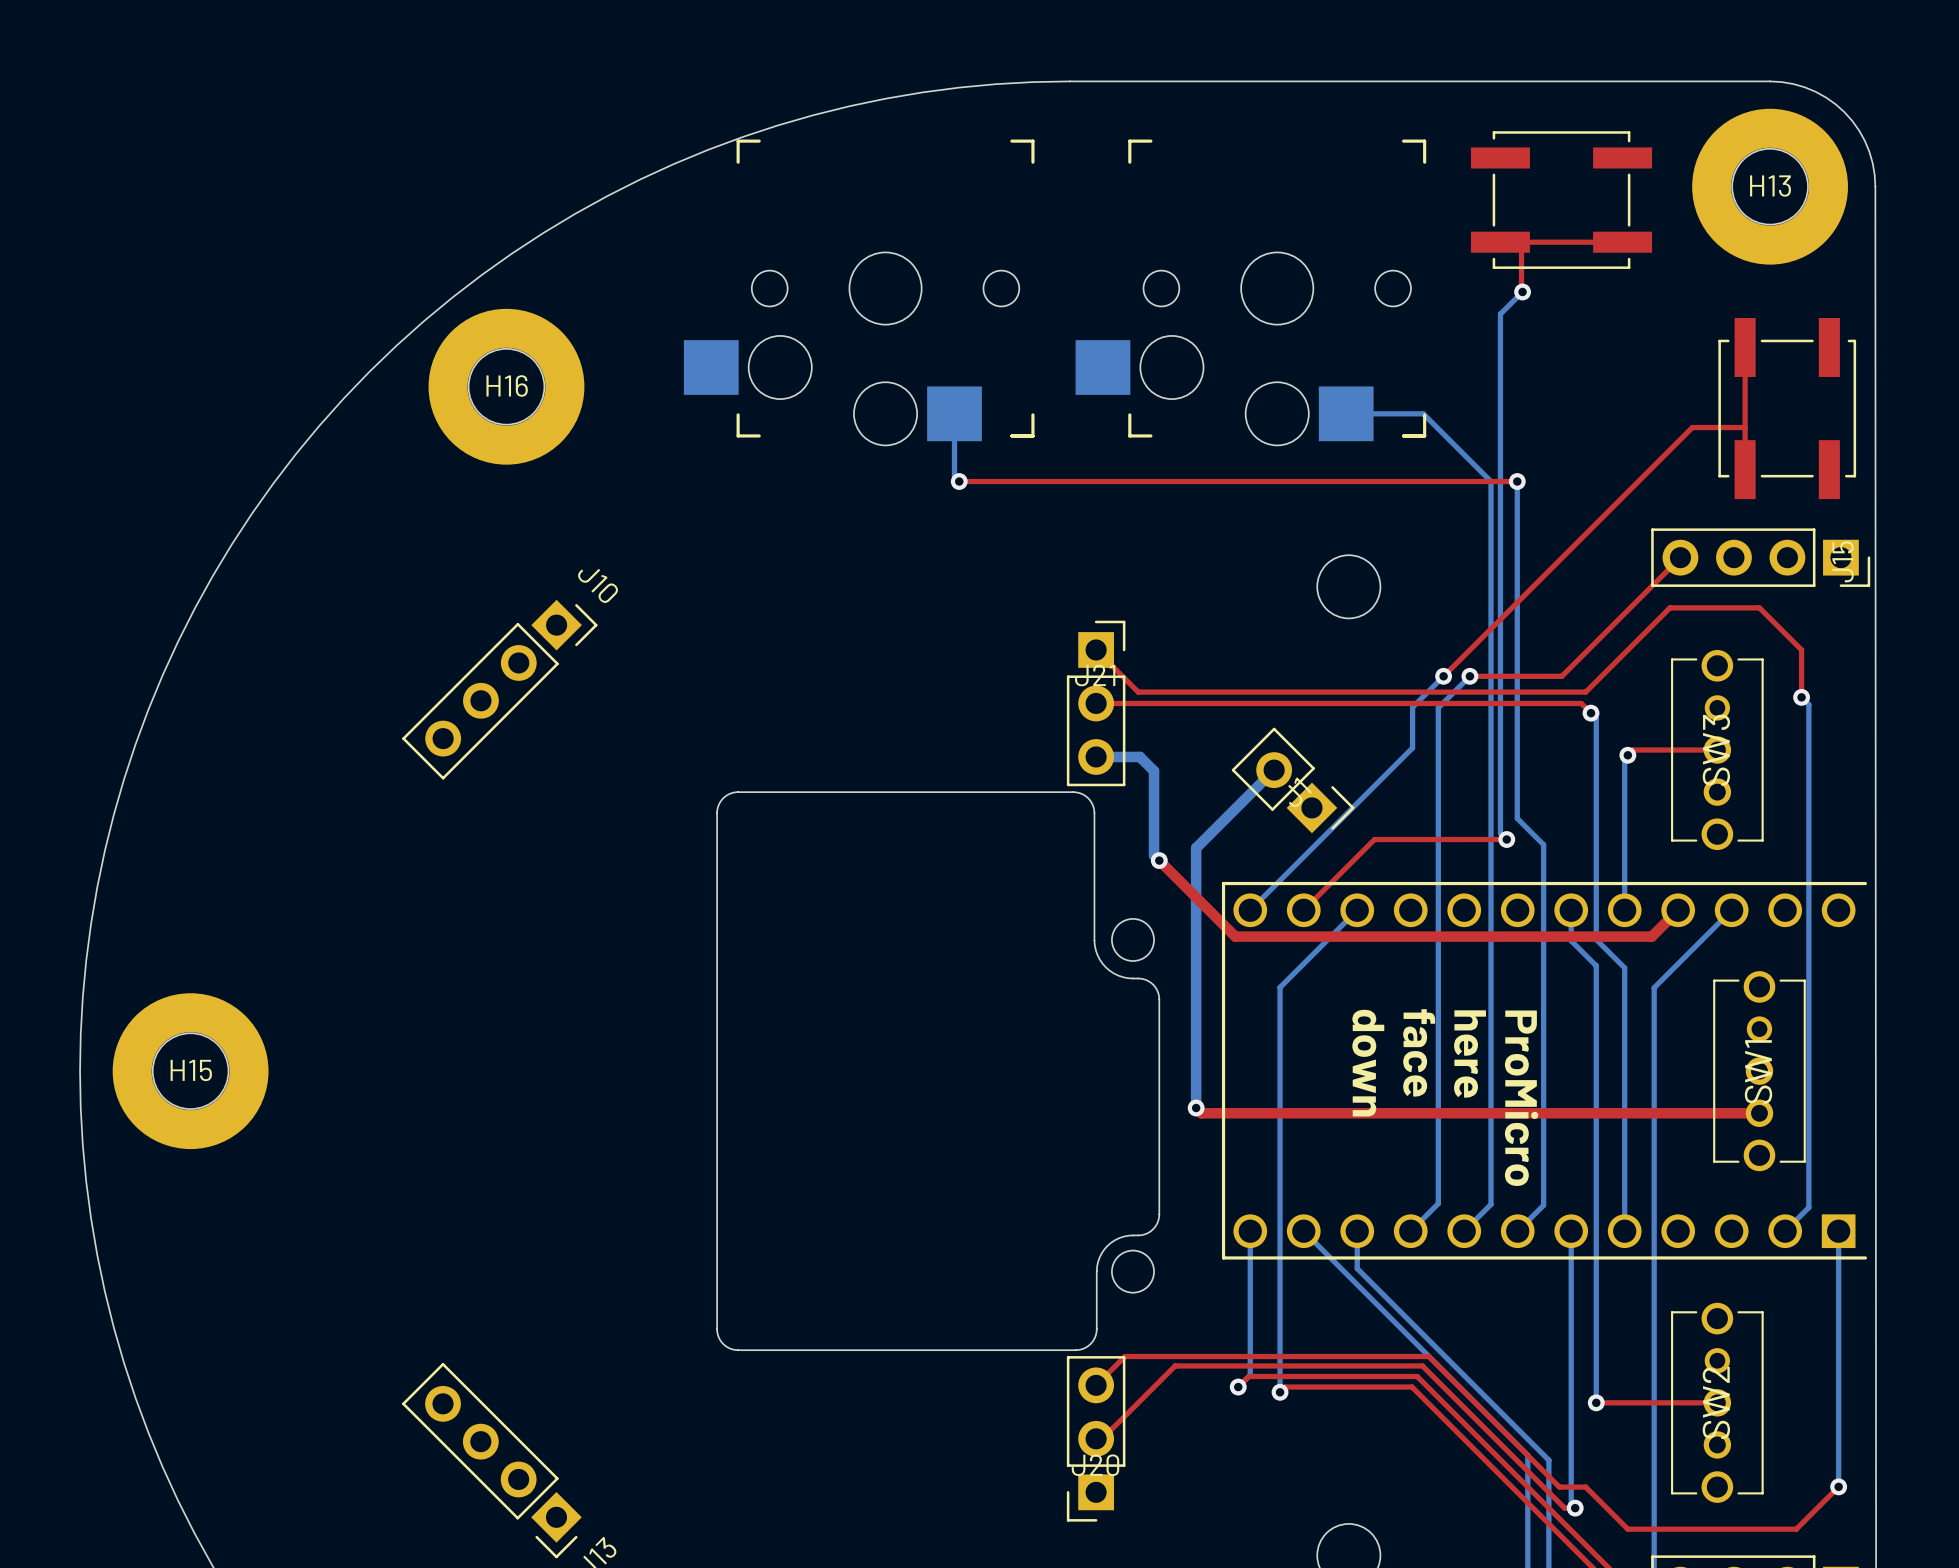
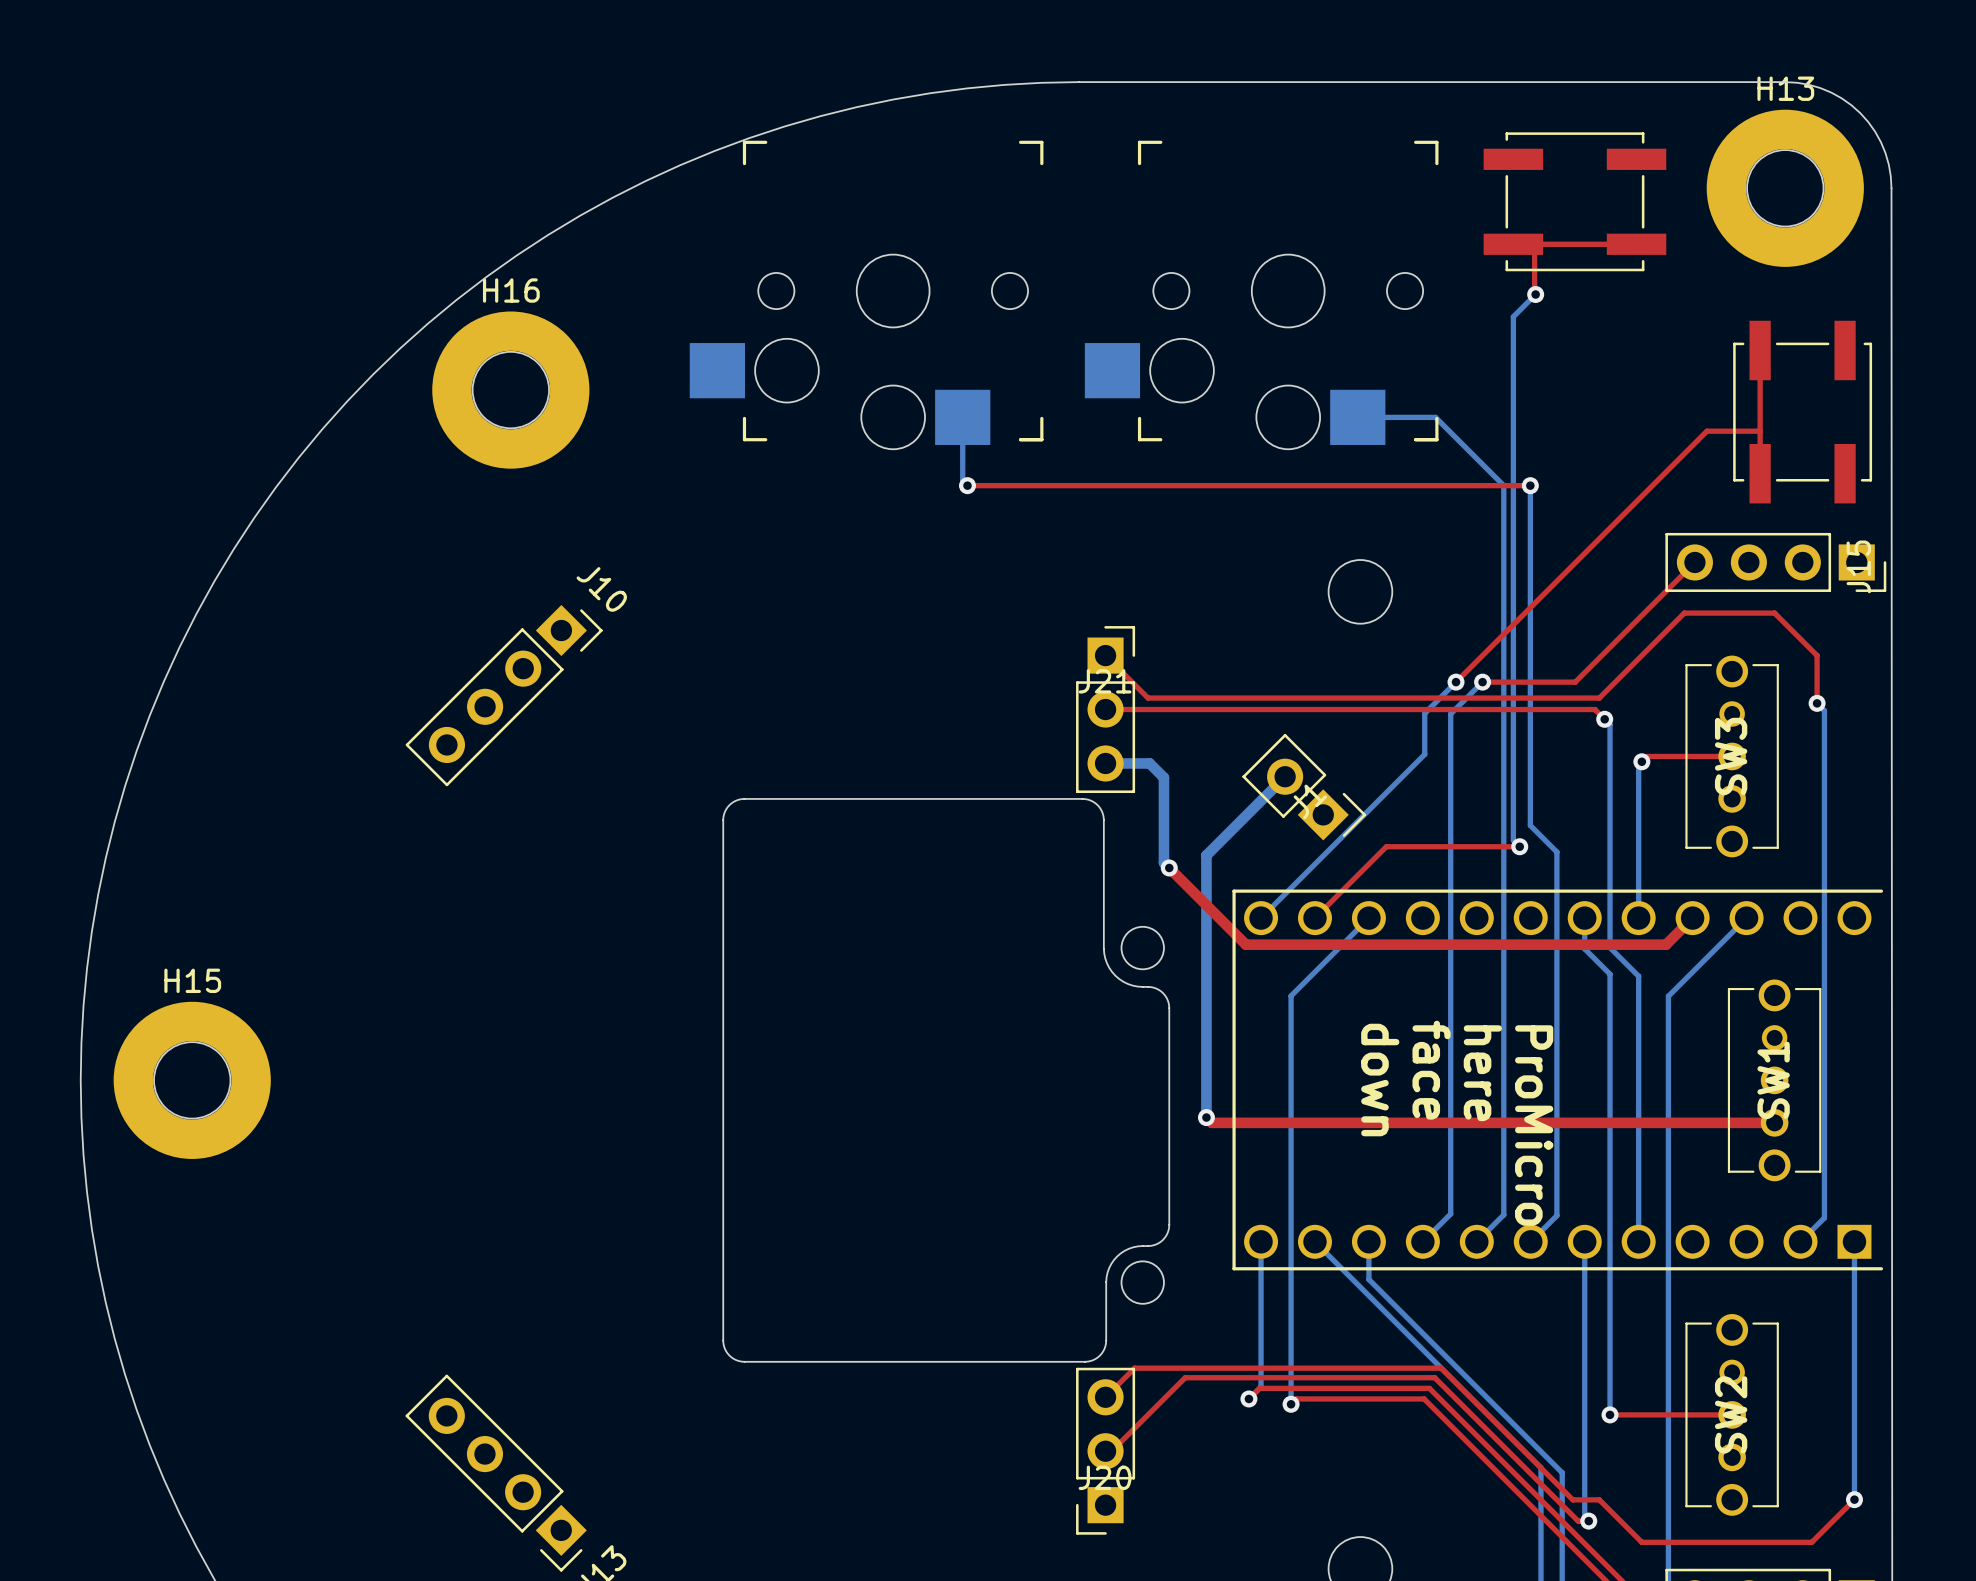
H13 name position: H13 (1770, 186) -> H13 (1785, 88)
H16 name position: H16 (507, 385) -> H16 (511, 290)
H15 name position: H15 (191, 1070) -> H15 (192, 980)

